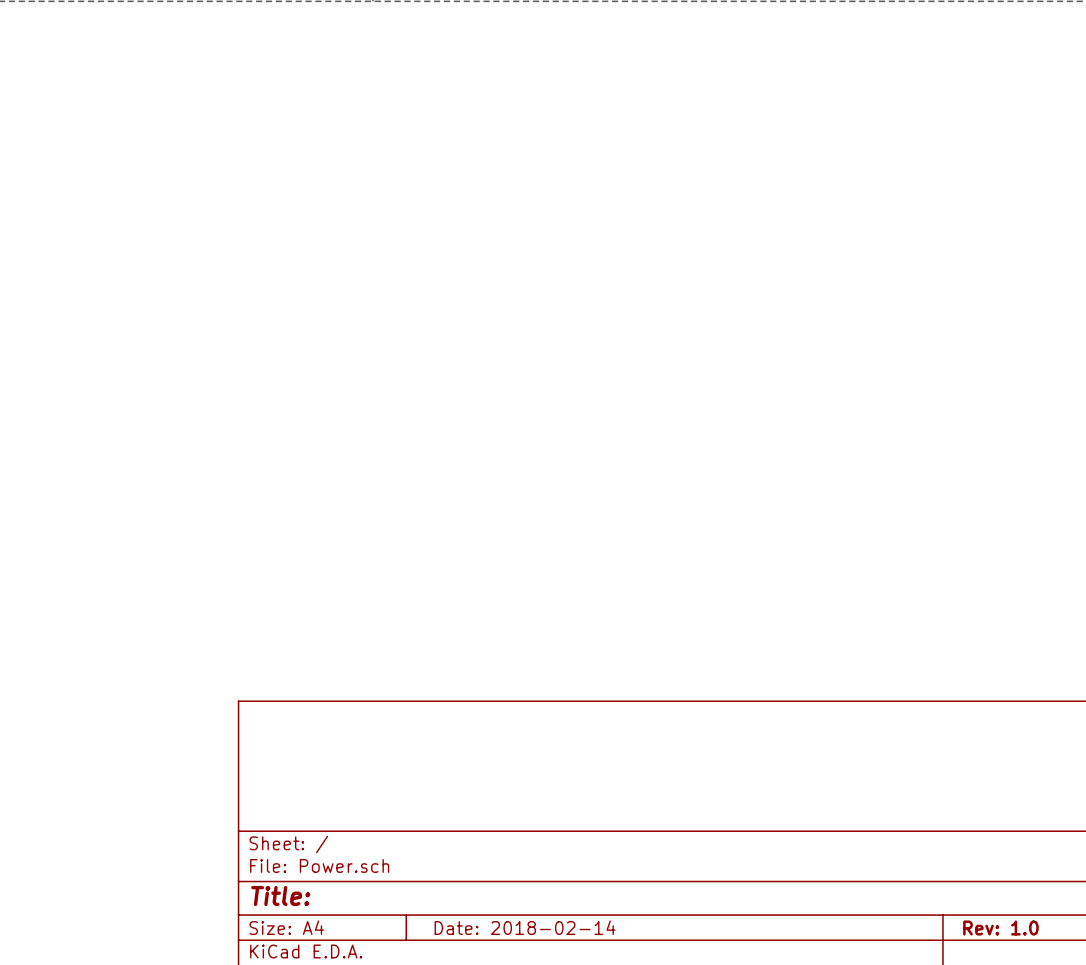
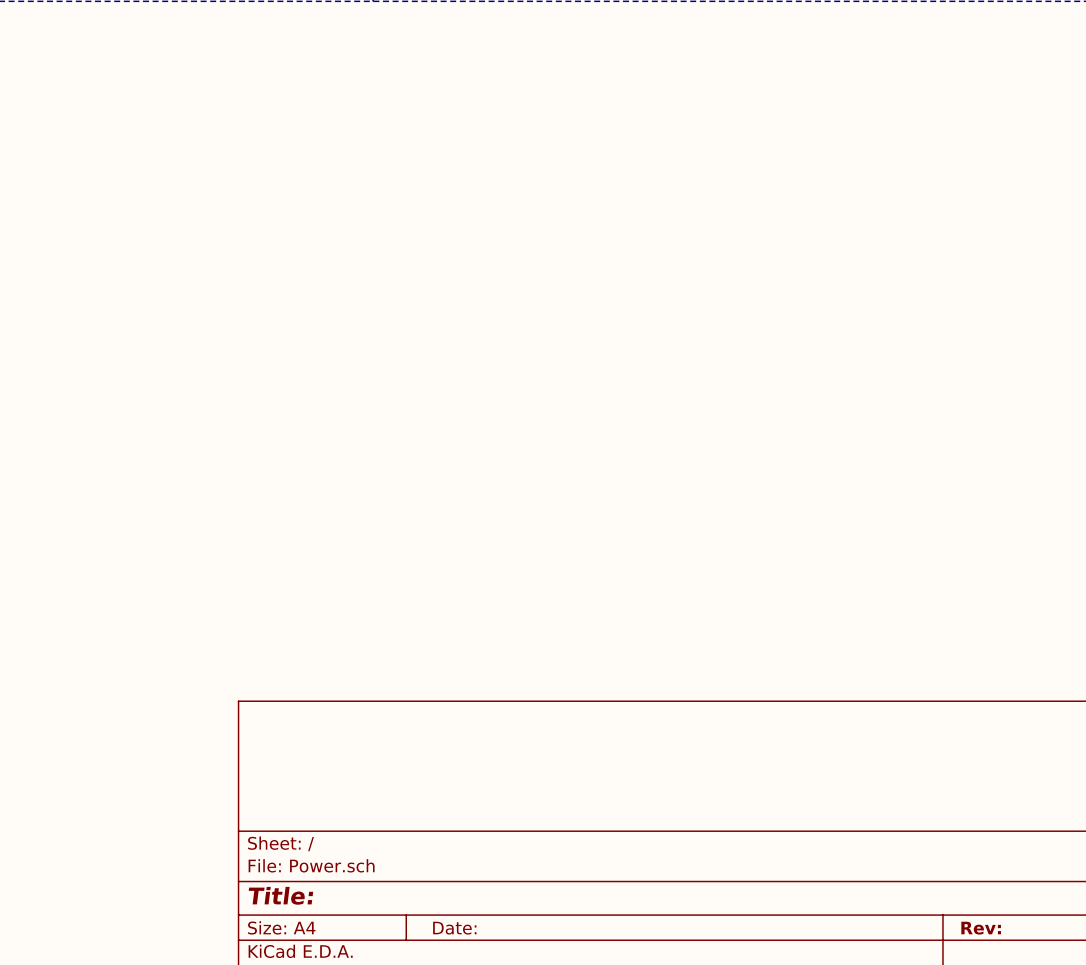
title block: Date: 2018-02-14 (525, 927) -> Date: (454, 928)
title block: Rev: 1.0 (1000, 928) -> Rev: (981, 928)

